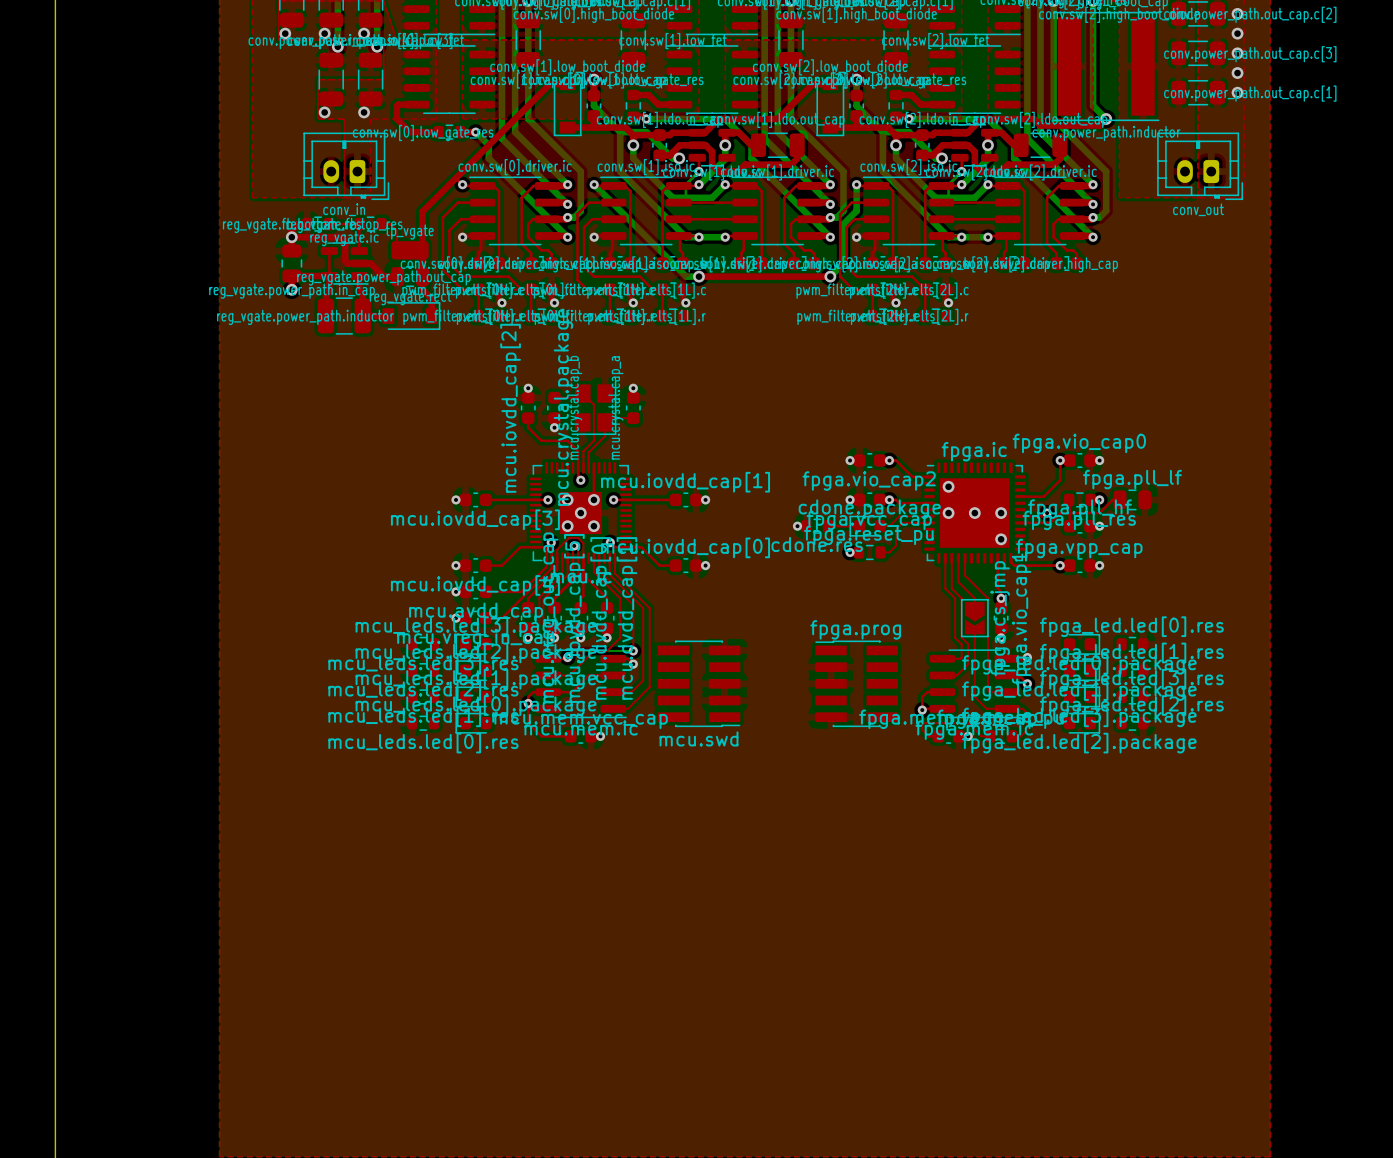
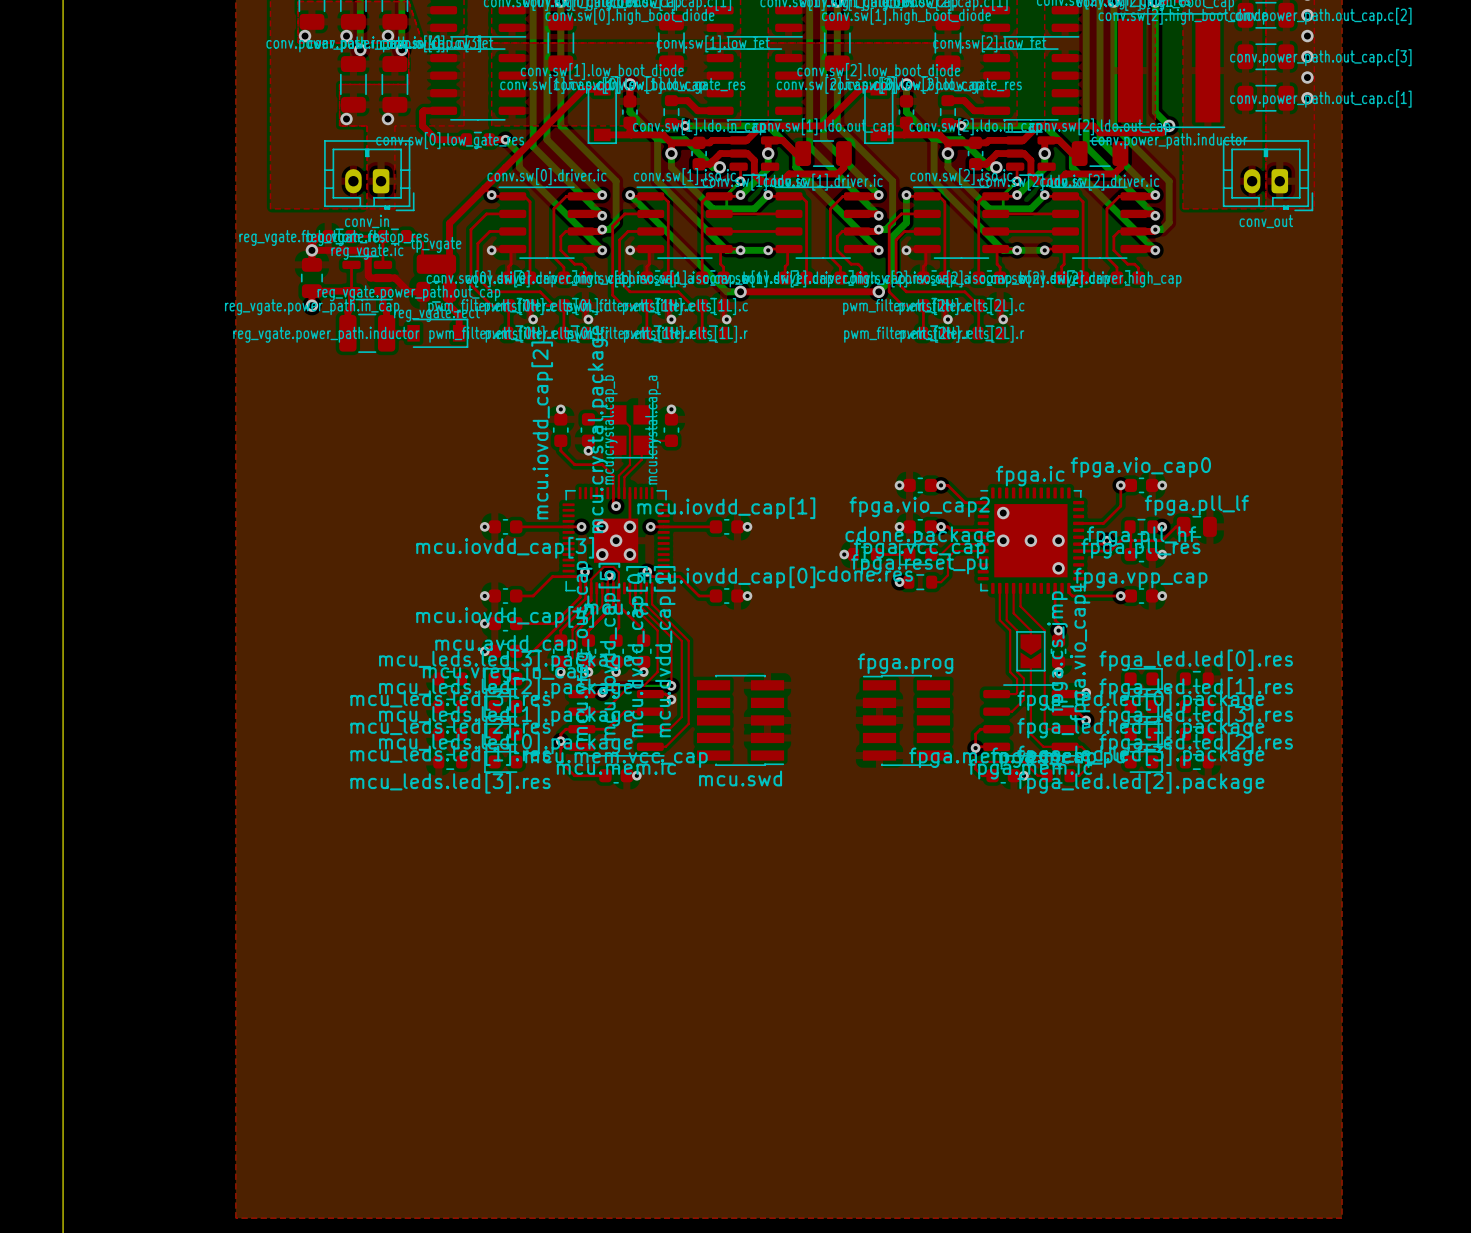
mcu_leds.led[0].res name: mcu_leds.led[0].res (423, 743) -> mcu_leds.led[3].res (450, 782)

